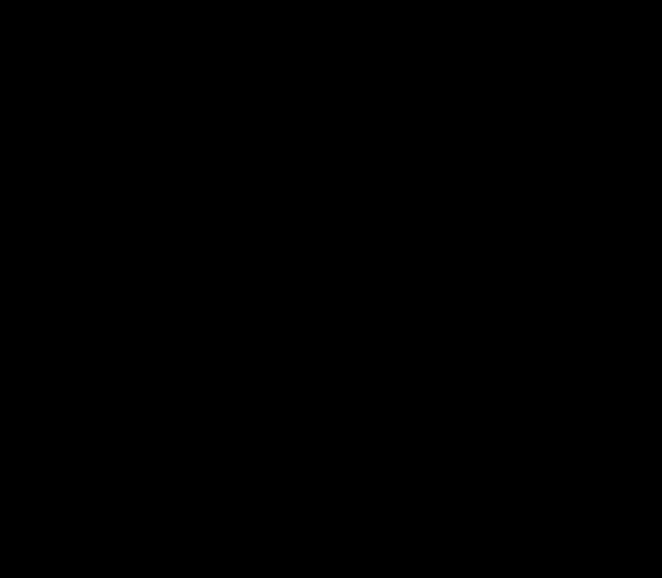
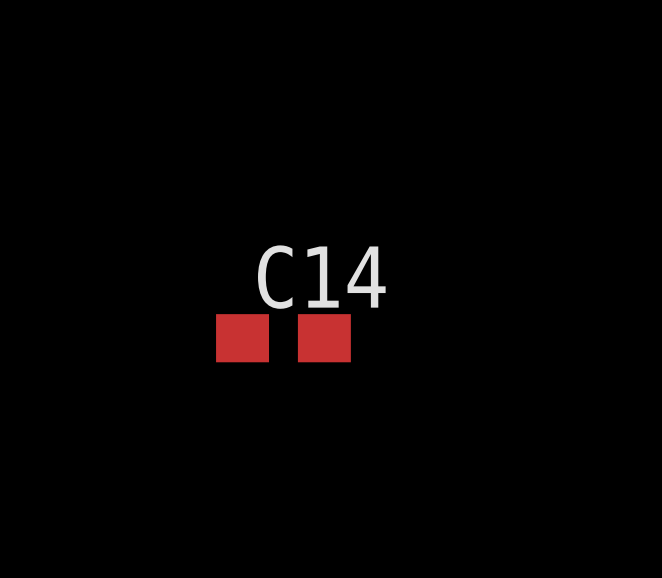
C14: none -> (283, 338)

